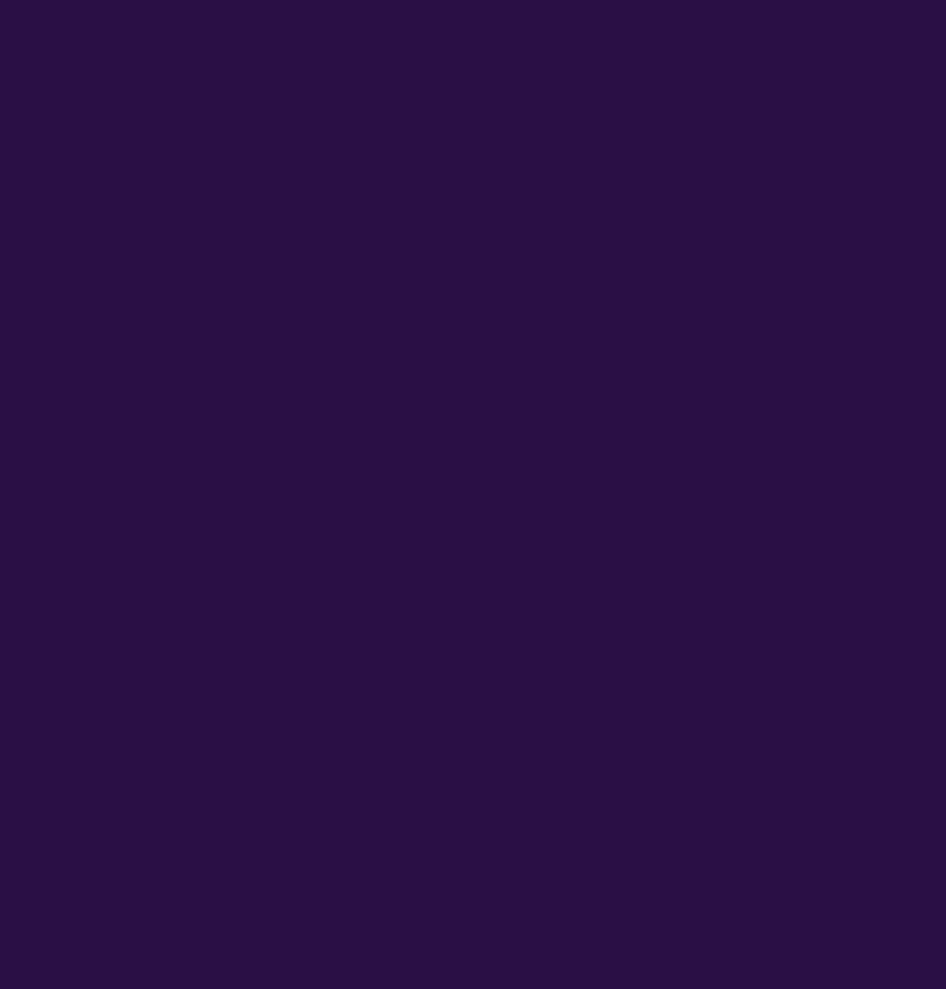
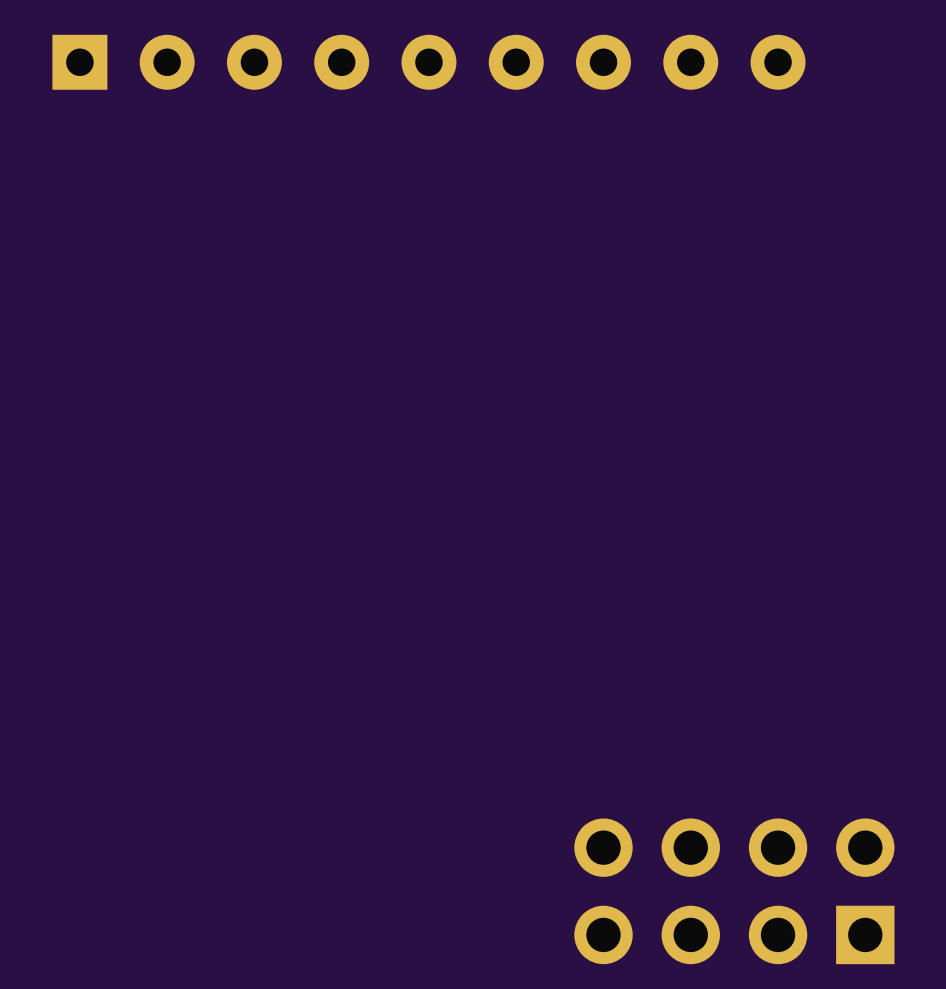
part: none -> (428, 62)
part: none -> (734, 891)

